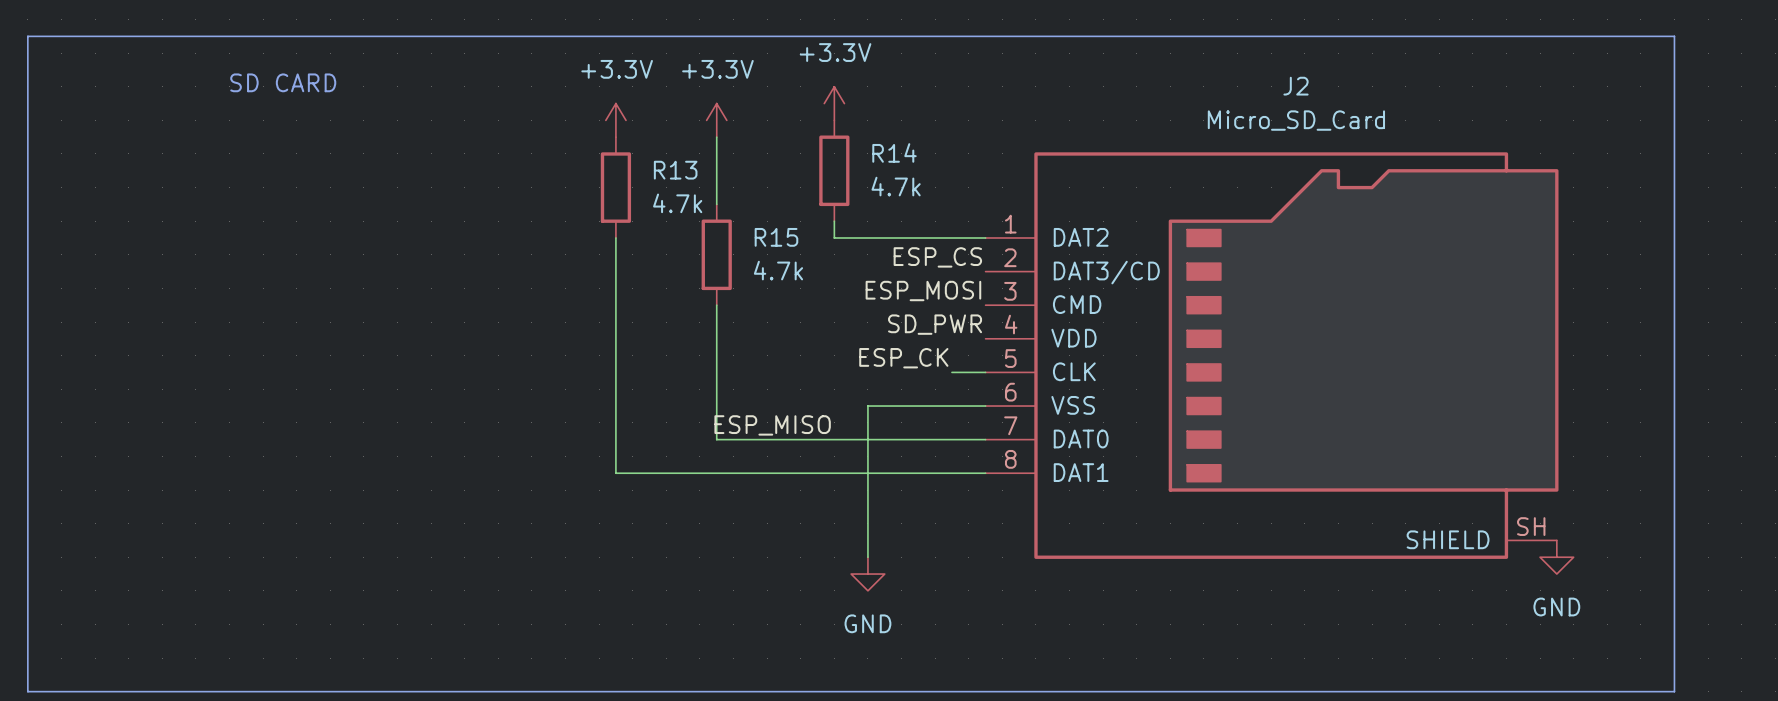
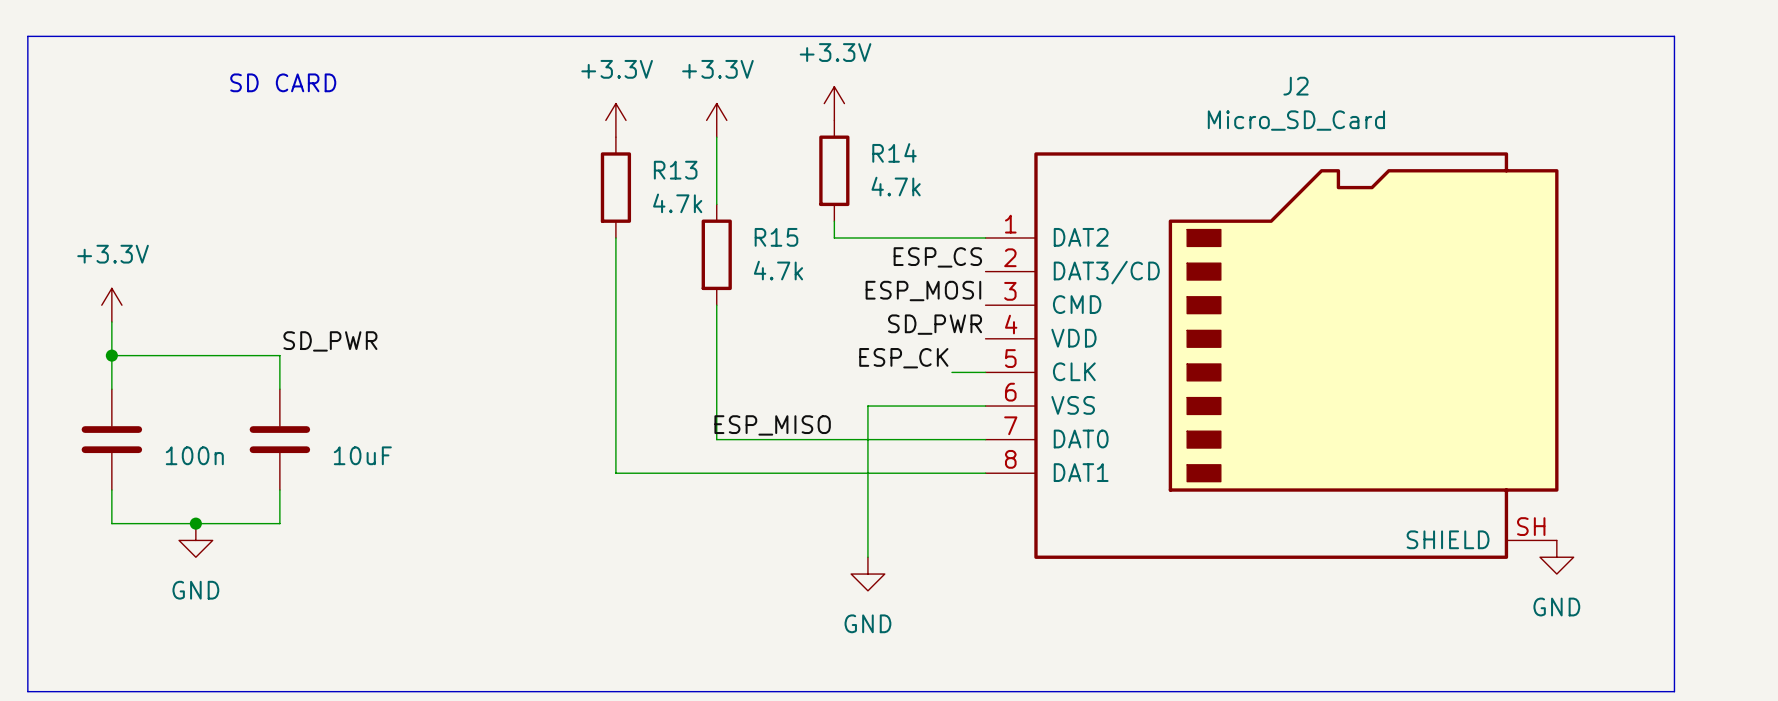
power symbol: none -> +3.3V (111, 305)
wire: none -> (111, 322) (111, 389)
label: none -> SD_PWR (330, 341)
wire: none -> (111, 355) (279, 355) (279, 389)
junction: none -> (111, 355)
part: none -> 100n (111, 439)
part: none -> 10uF (279, 439)
wire: none -> (111, 490) (111, 523) (279, 523) (279, 490)
junction: none -> (195, 523)
power symbol: none -> GND (195, 540)

